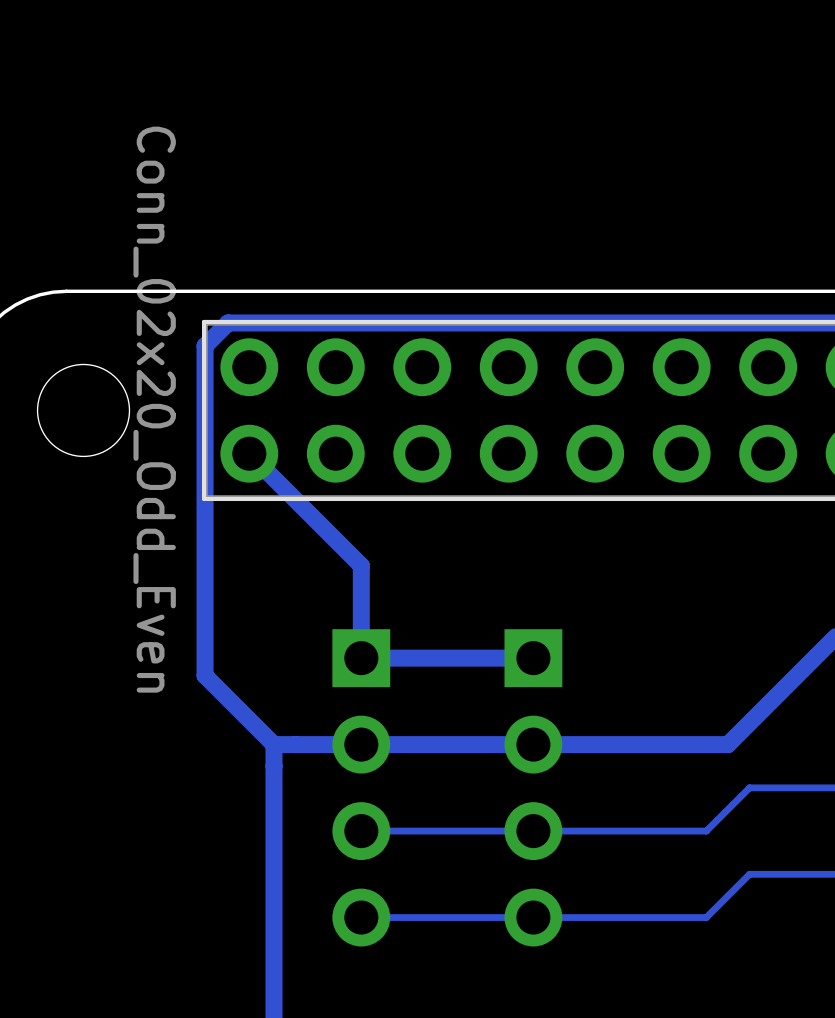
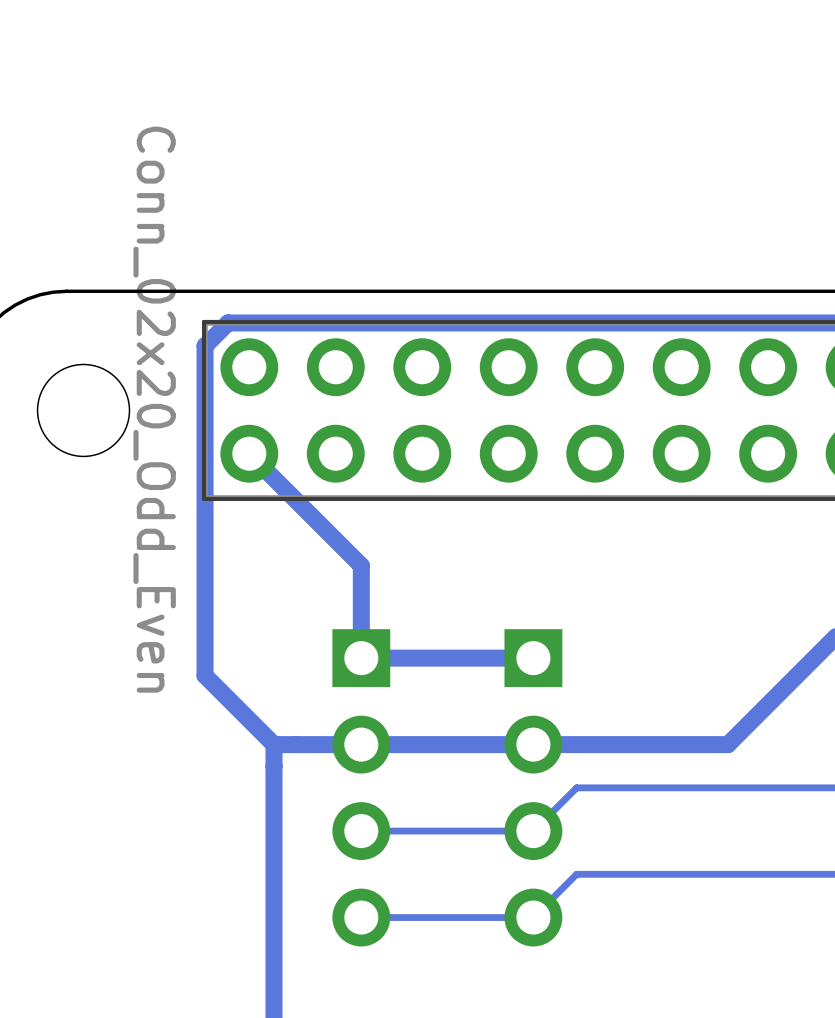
track: (749, 787) (706, 831) (533, 831) -> (749, 787) (576, 787) (533, 831)
track: (749, 874) (706, 917) (533, 917) -> (749, 874) (576, 874) (533, 917)

